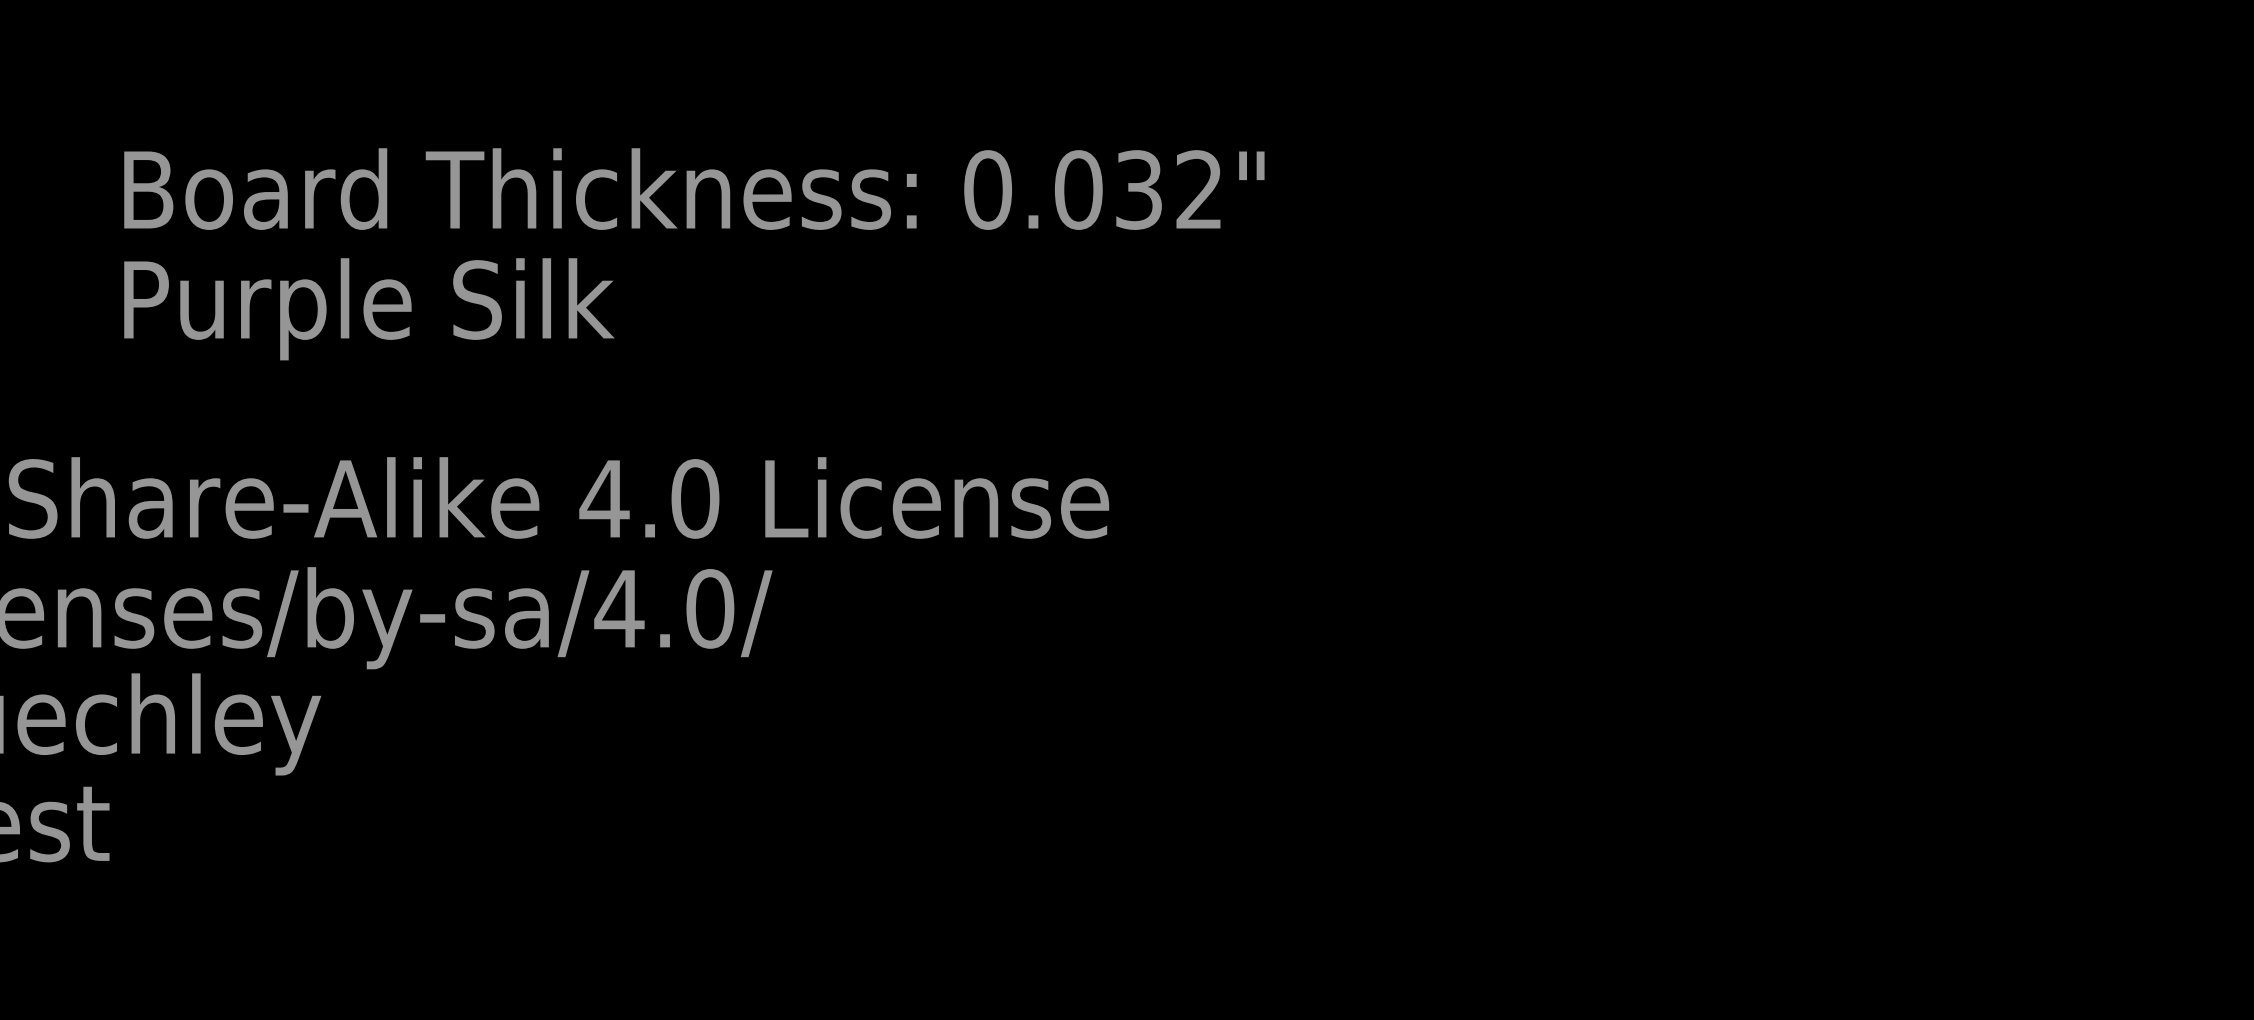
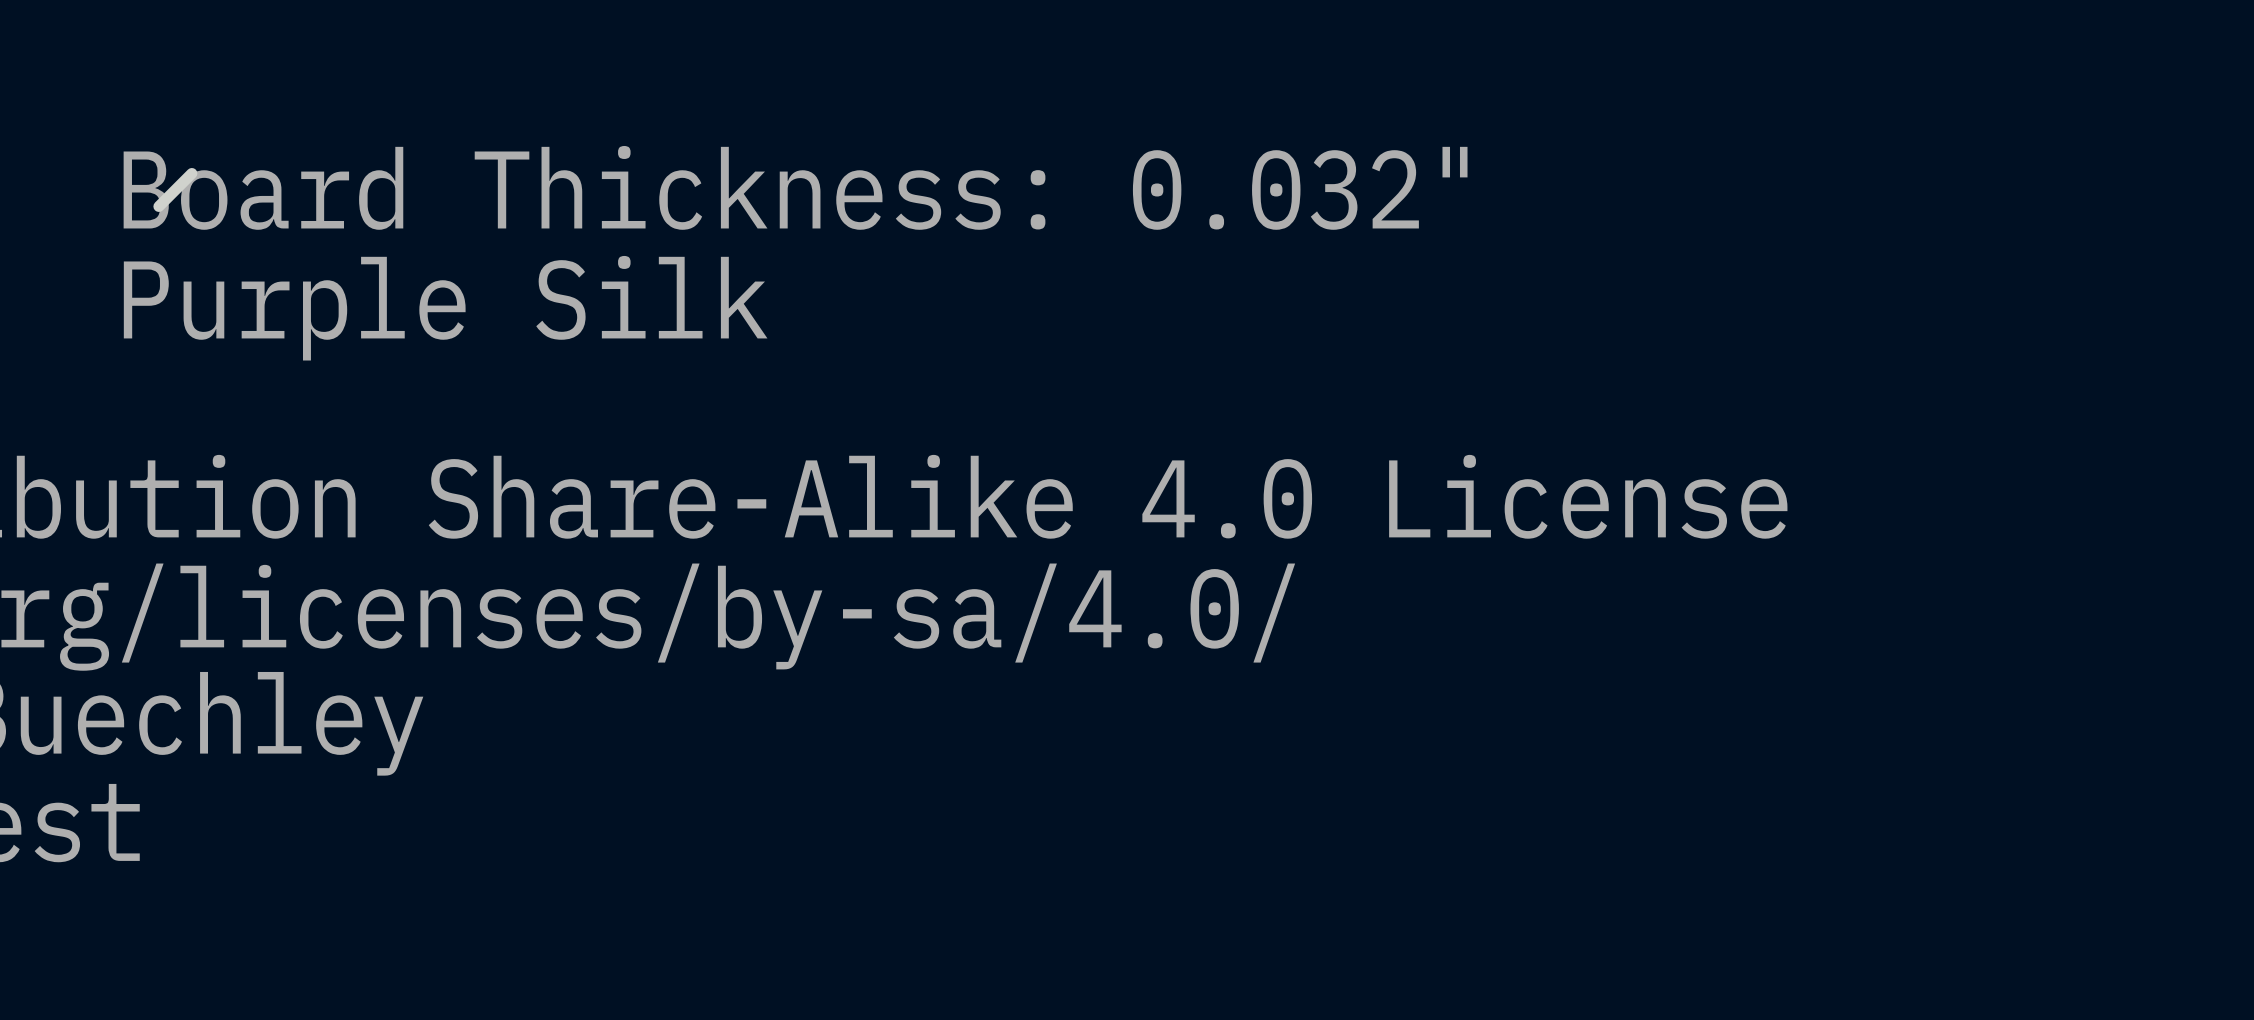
board edge: none -> (191, 173) (158, 206)

